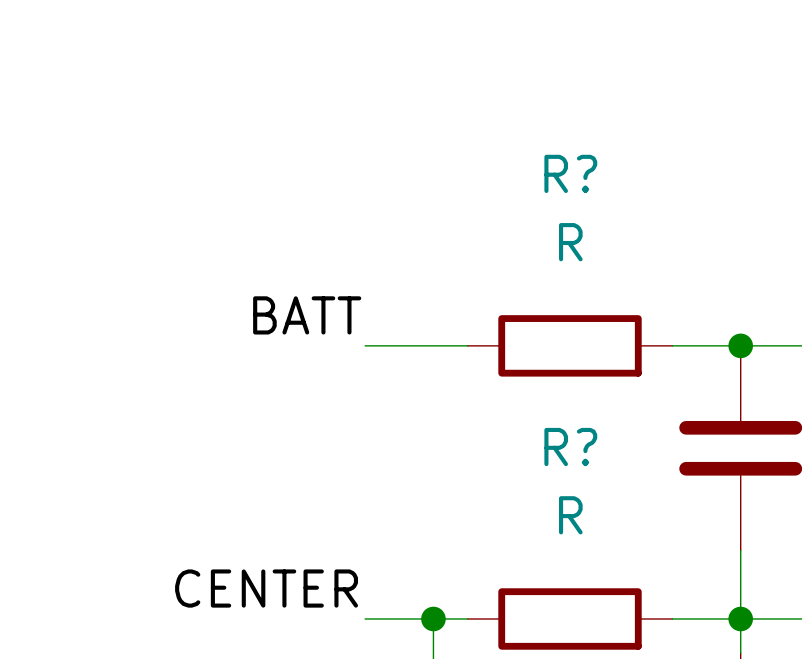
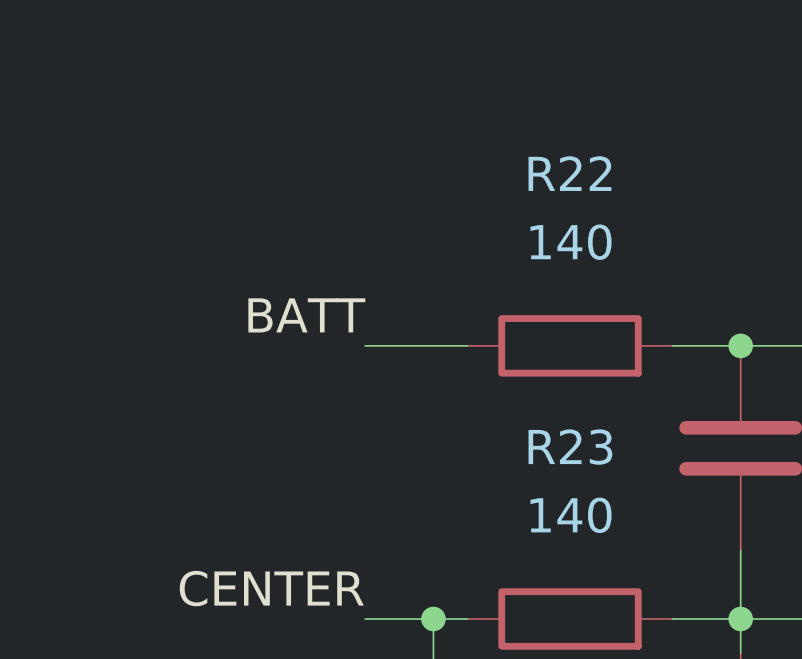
R? name: R? (570, 173) -> R22 (569, 173)
R? value: R (570, 242) -> 140 (571, 242)
R? name: R? (570, 447) -> R23 (570, 447)
R? value: R (570, 515) -> 140 (571, 515)

